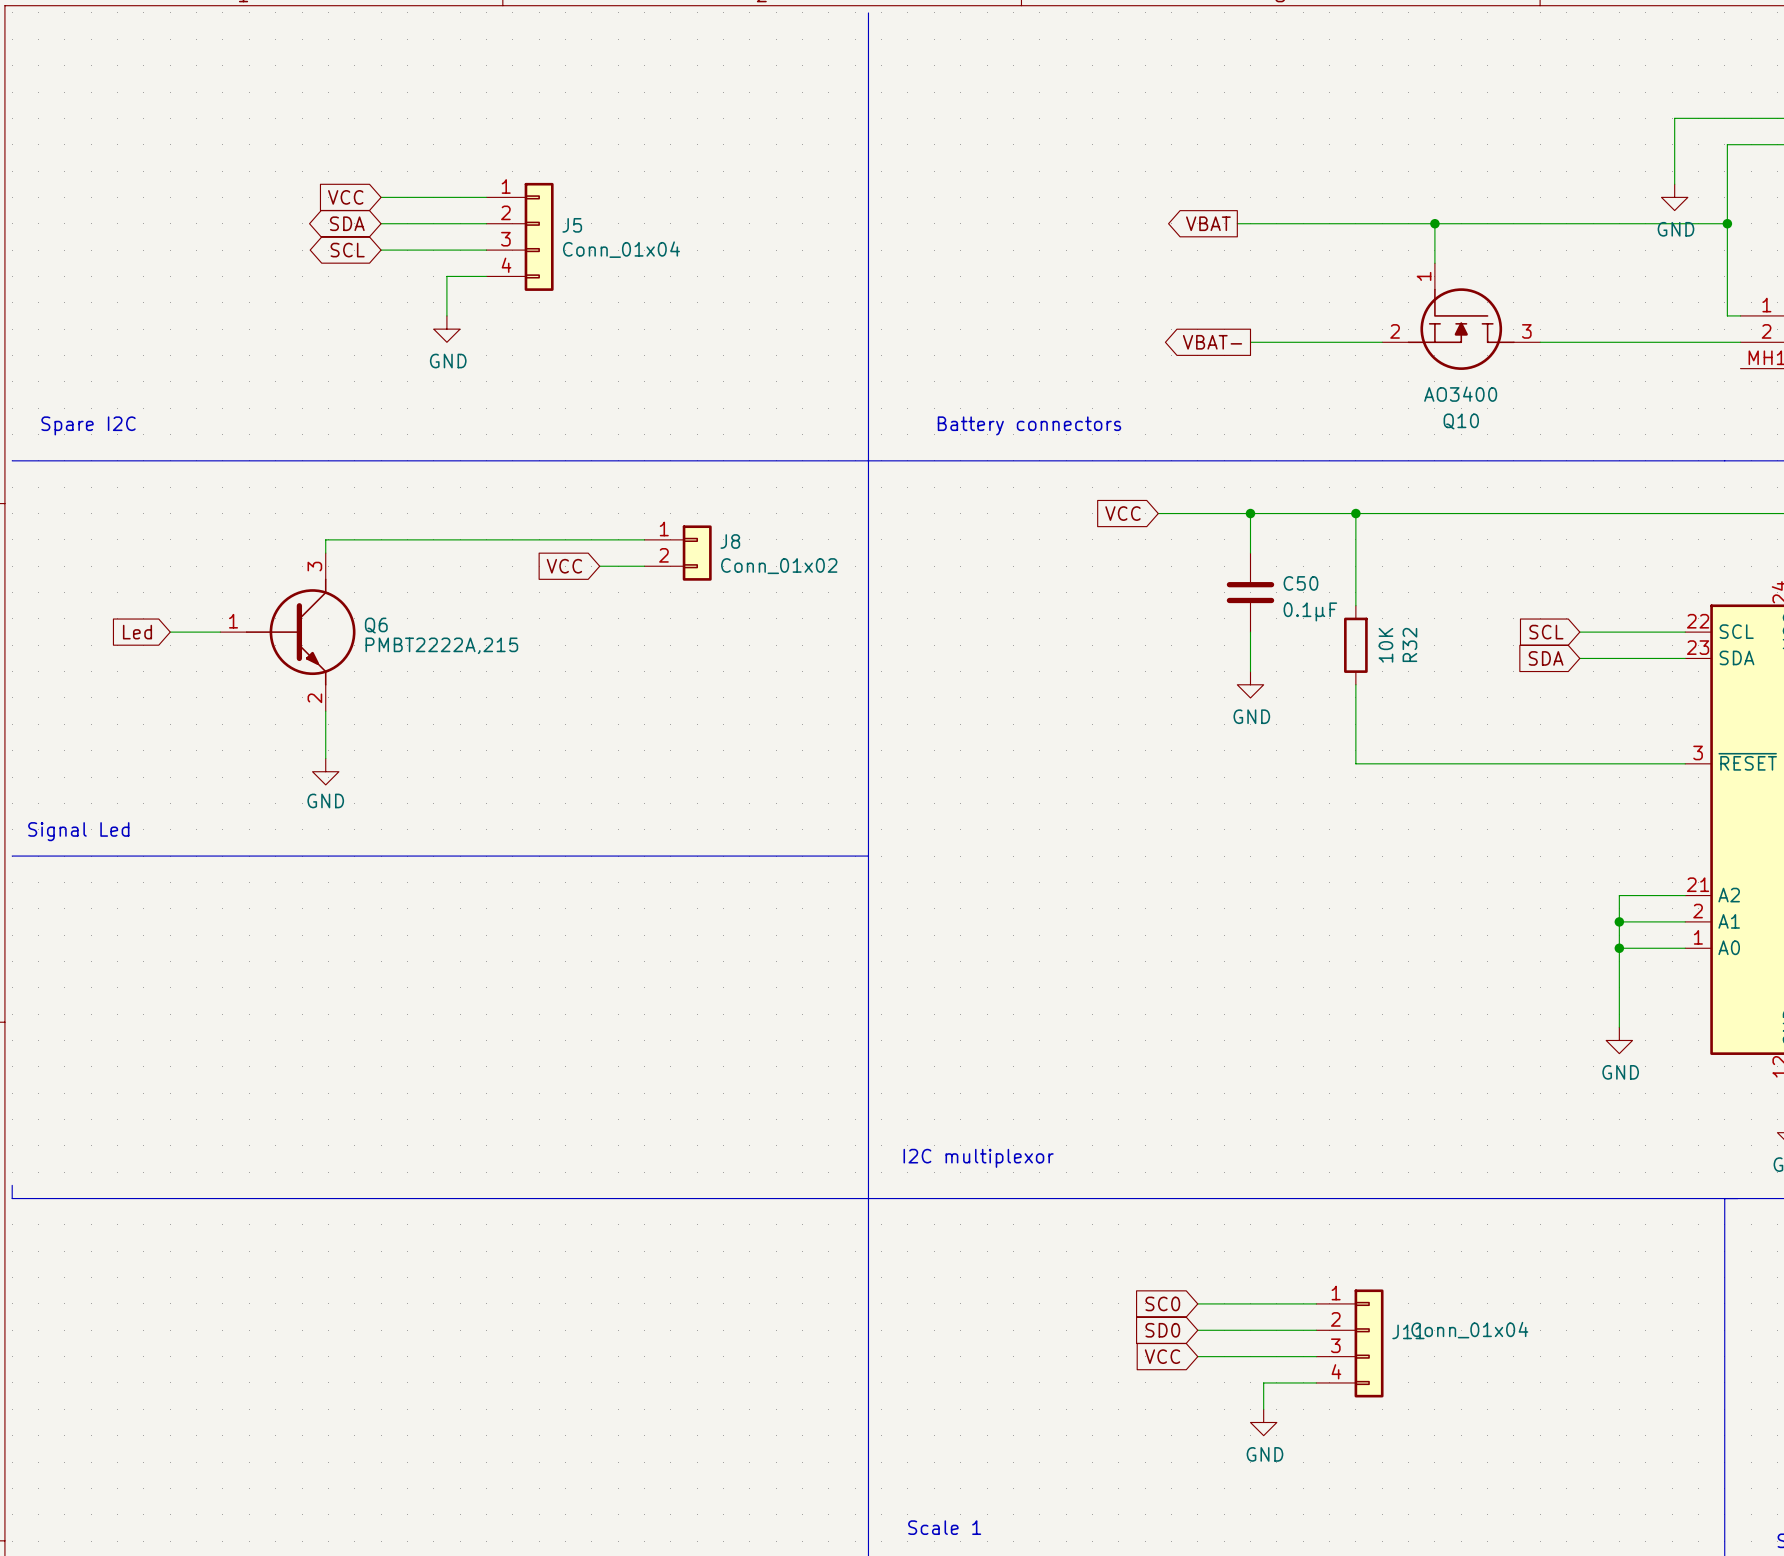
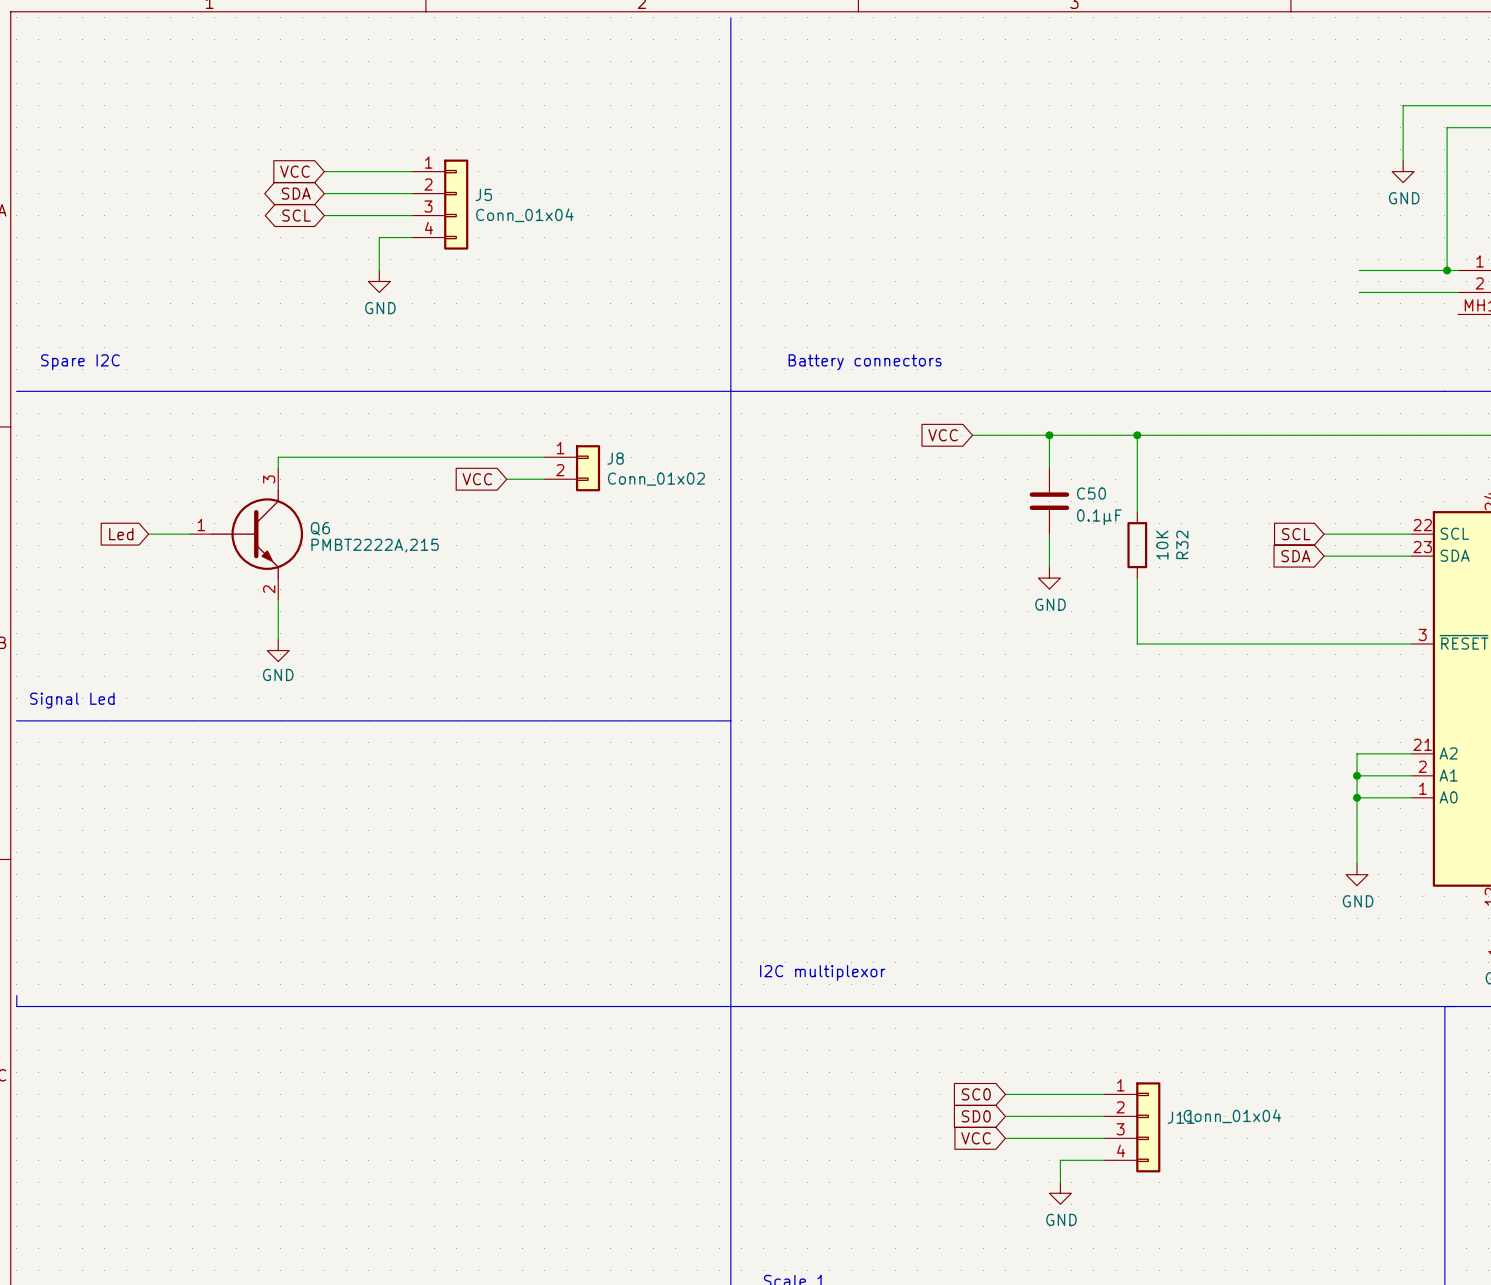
global label: VBAT (1208, 223) -> none
wire: (1237, 223) (1727, 223) -> none
wire: (1434, 223) (1434, 263) -> none
junction: (1434, 223) -> none
junction: (1727, 223) -> none
wire: none -> (1359, 270) (1447, 270)
junction: none -> (1447, 270)
Q10: AO3400 (1461, 316) -> none
global label: VBAT- (1212, 342) -> none
wire: (1250, 342) (1382, 342) -> none
wire: (1540, 342) (1621, 342) -> none

